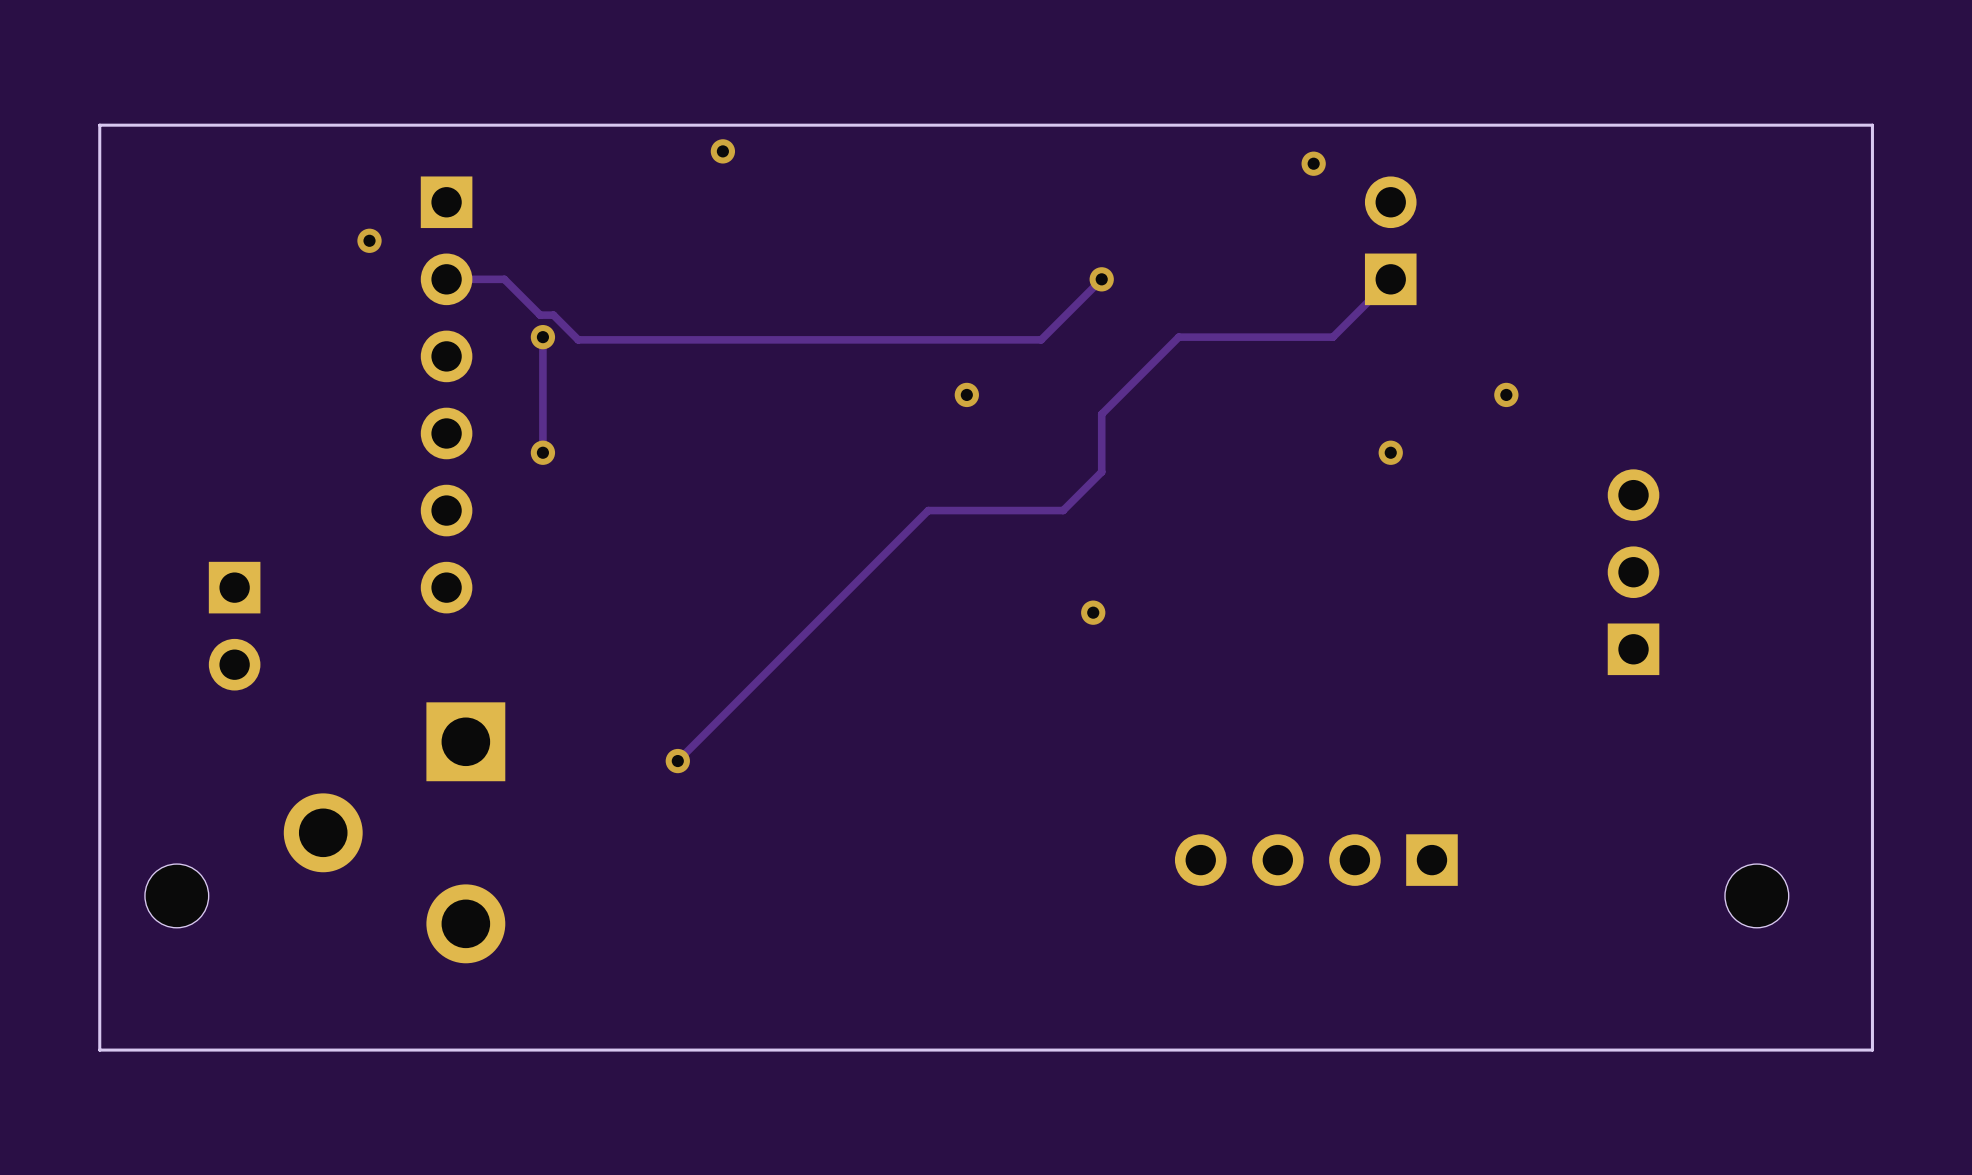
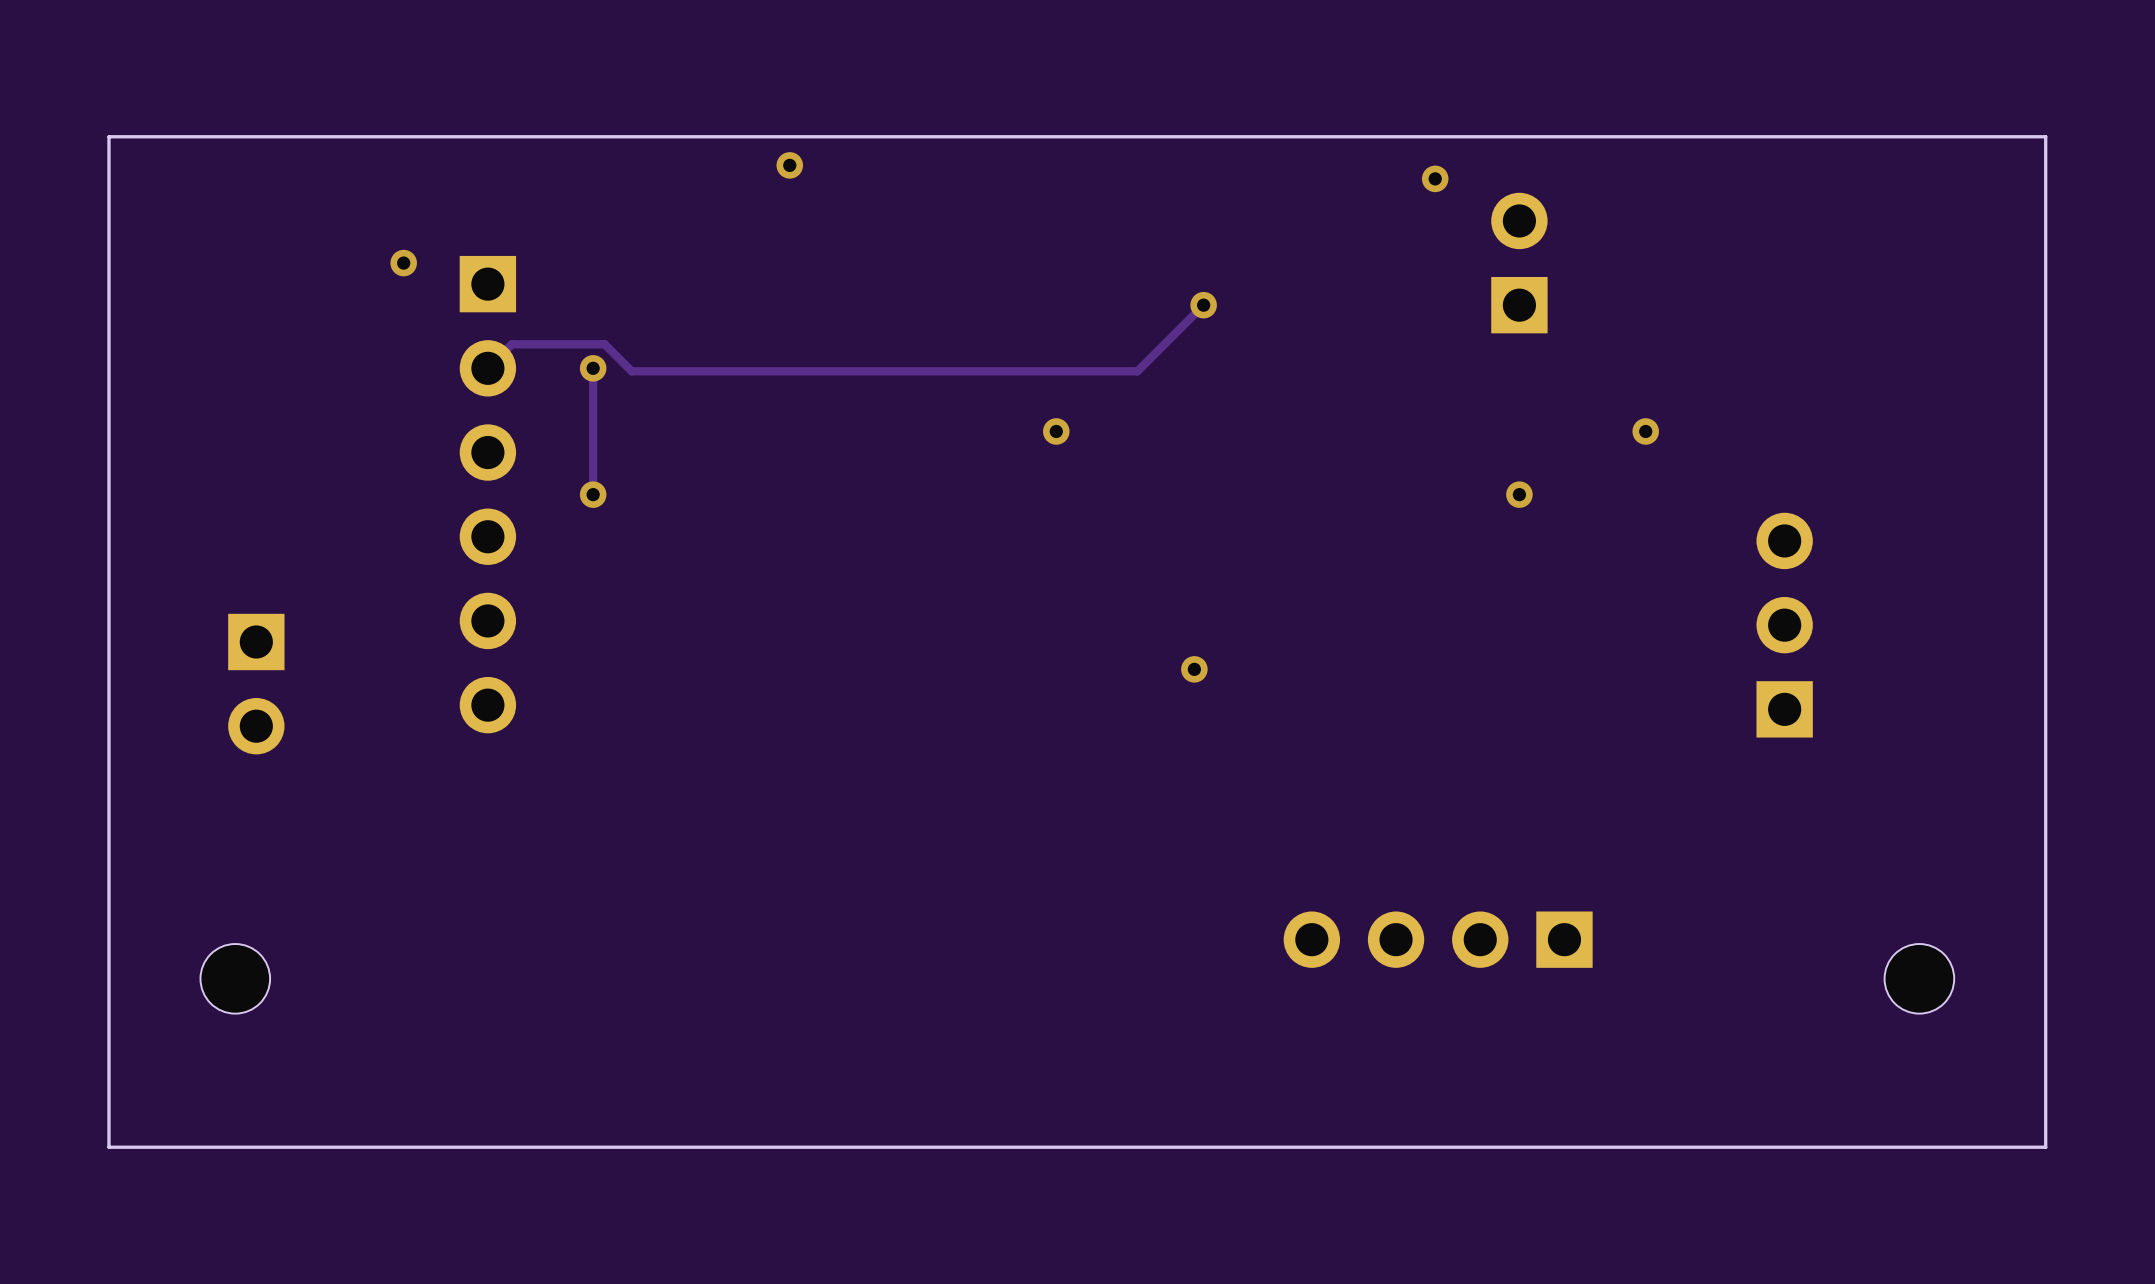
track: (1390, 279) (1332, 337) (1178, 337) (1101, 414) (1101, 472) (1063, 510) (928, 510) (677, 761) -> none
track: (446, 293) (446, 279) (504, 279) (540, 315) -> (487, 368) (511, 344) (590, 344)
part position: (446, 394) -> (487, 494)
via: (677, 761) -> none
part: (394, 832) -> none
part position: (176, 895) -> (235, 978)

